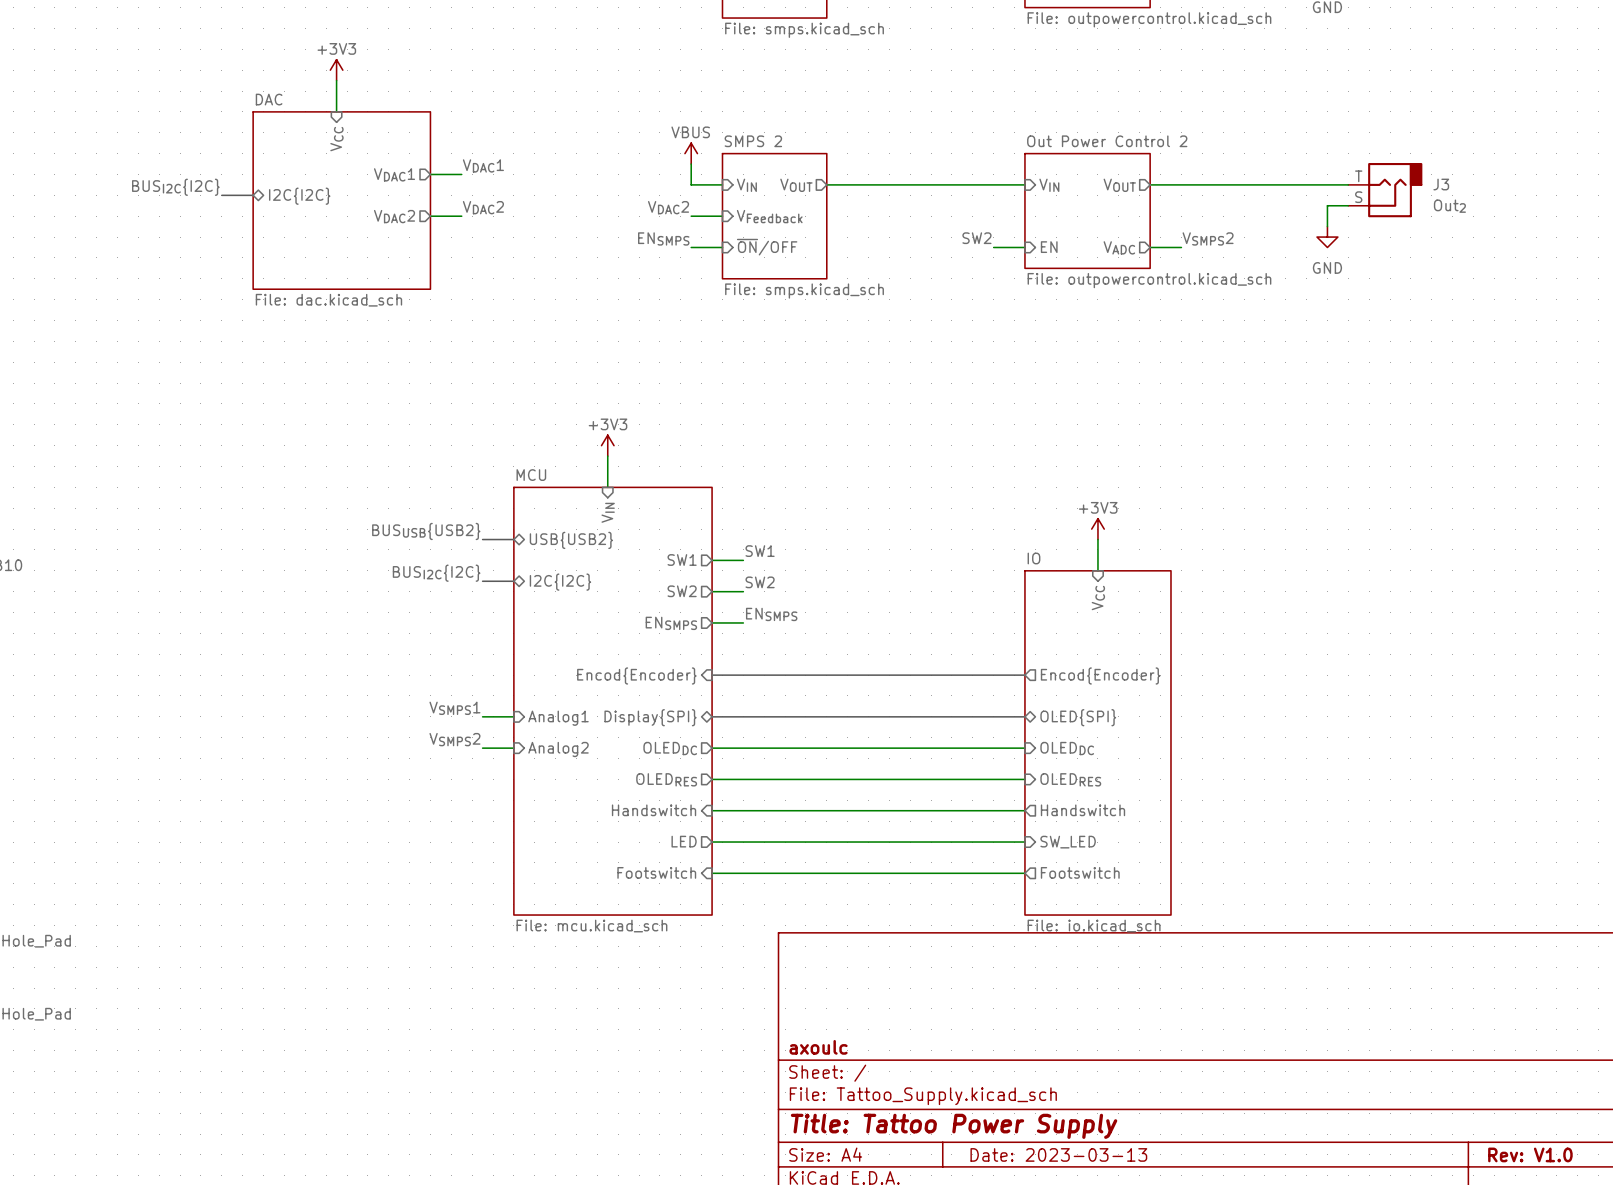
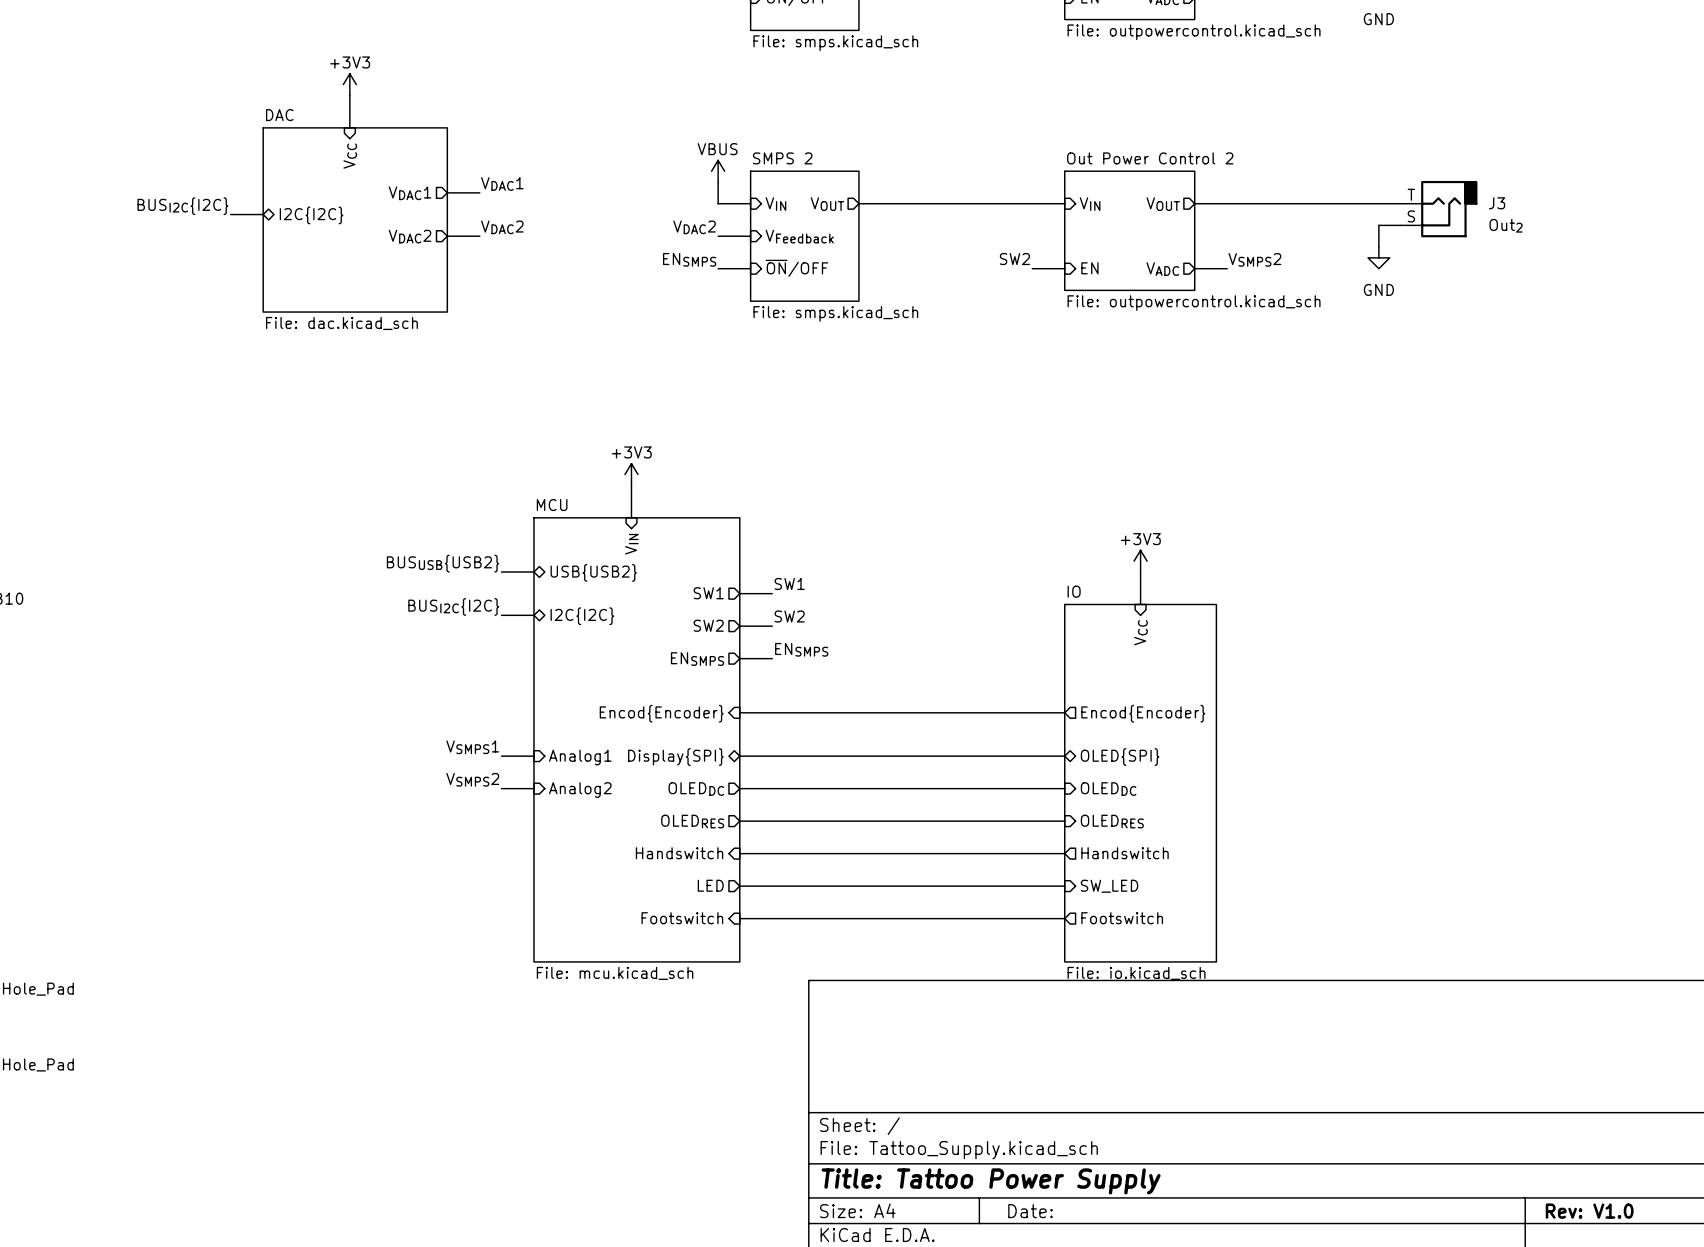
title block: axoulc (818, 1047) -> none
title block: Date: 2023-03-13 (1058, 1154) -> Date: (1030, 1211)

